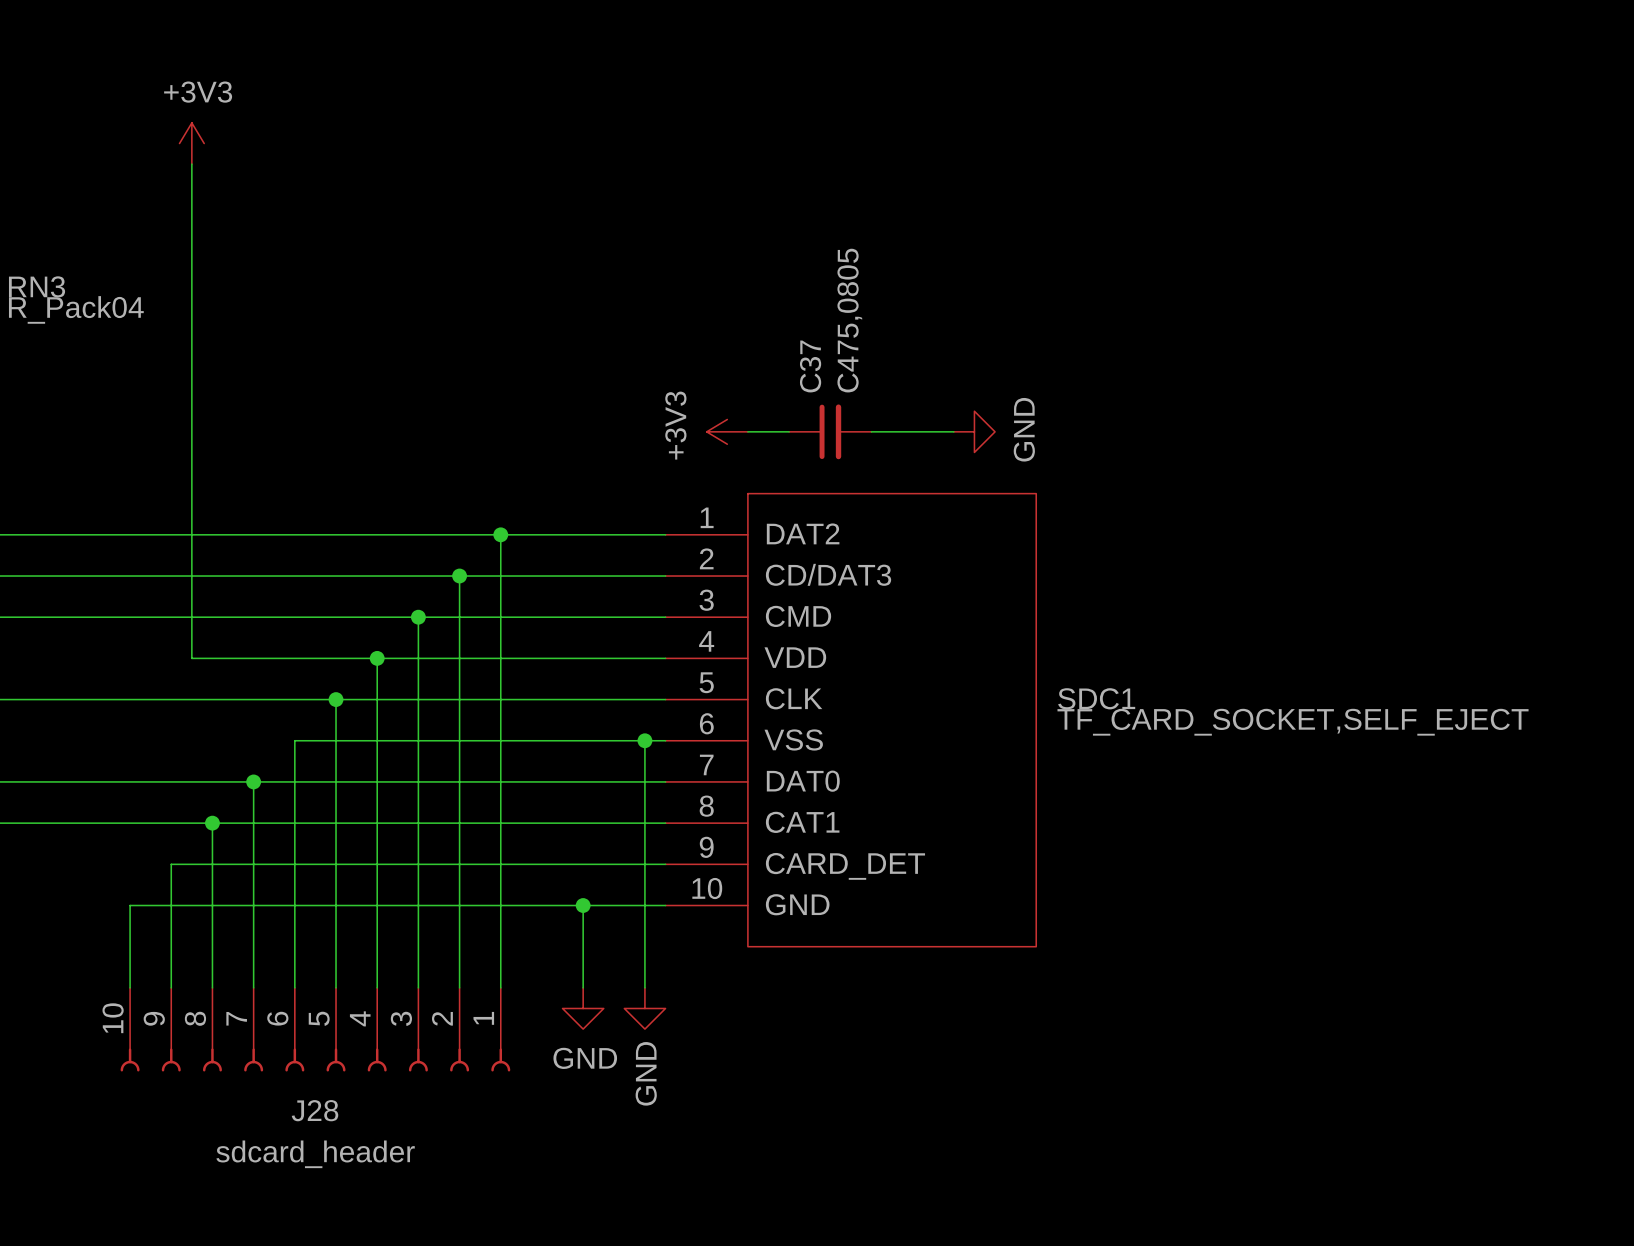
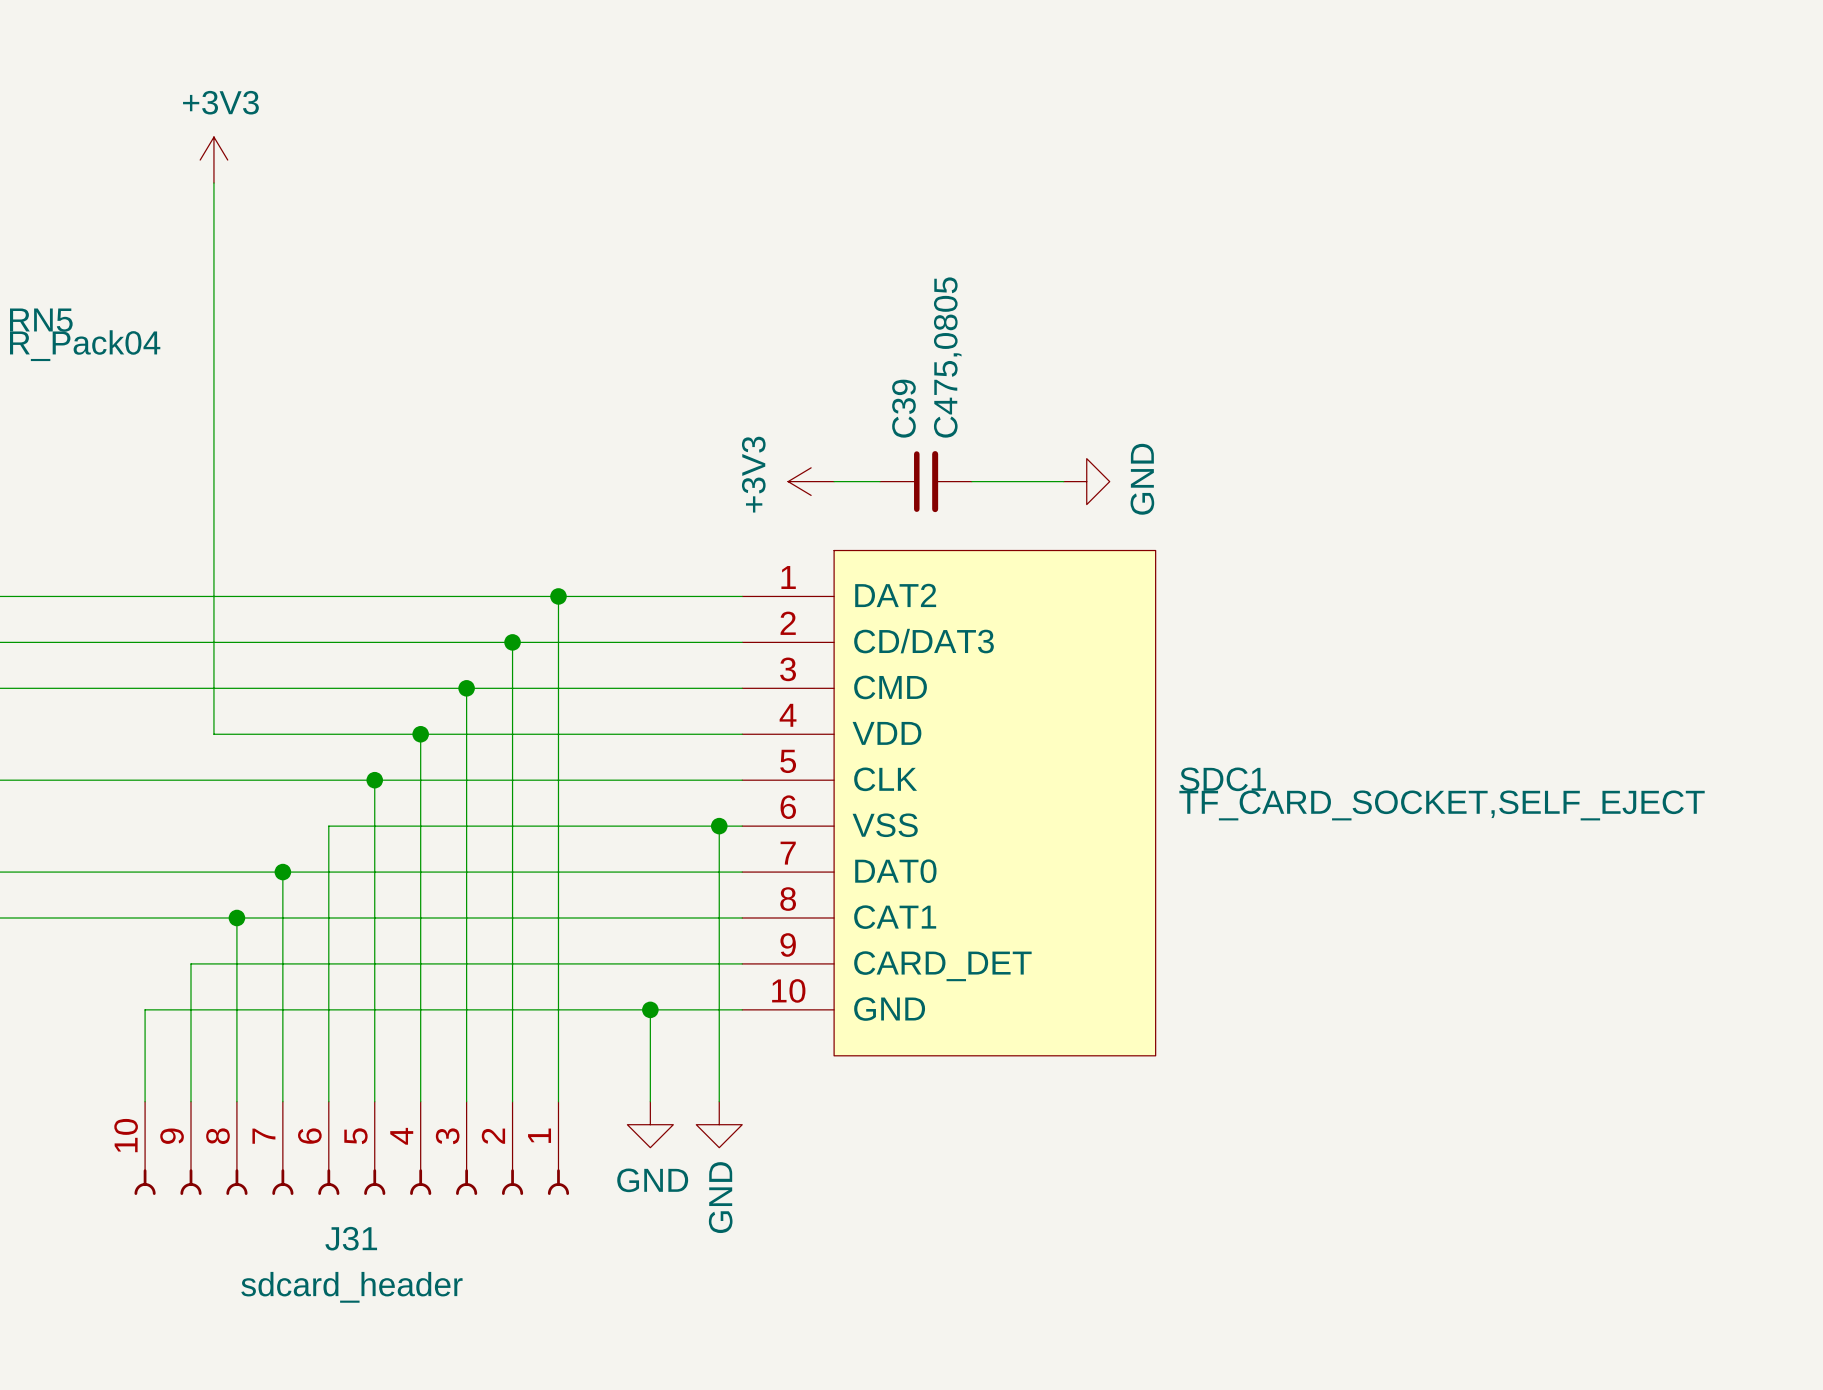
RN3 name: RN3 (37, 286) -> RN5 (41, 320)
C37 name: C37 (810, 366) -> C39 (903, 408)
J28 name: J28 (315, 1110) -> J31 (351, 1238)

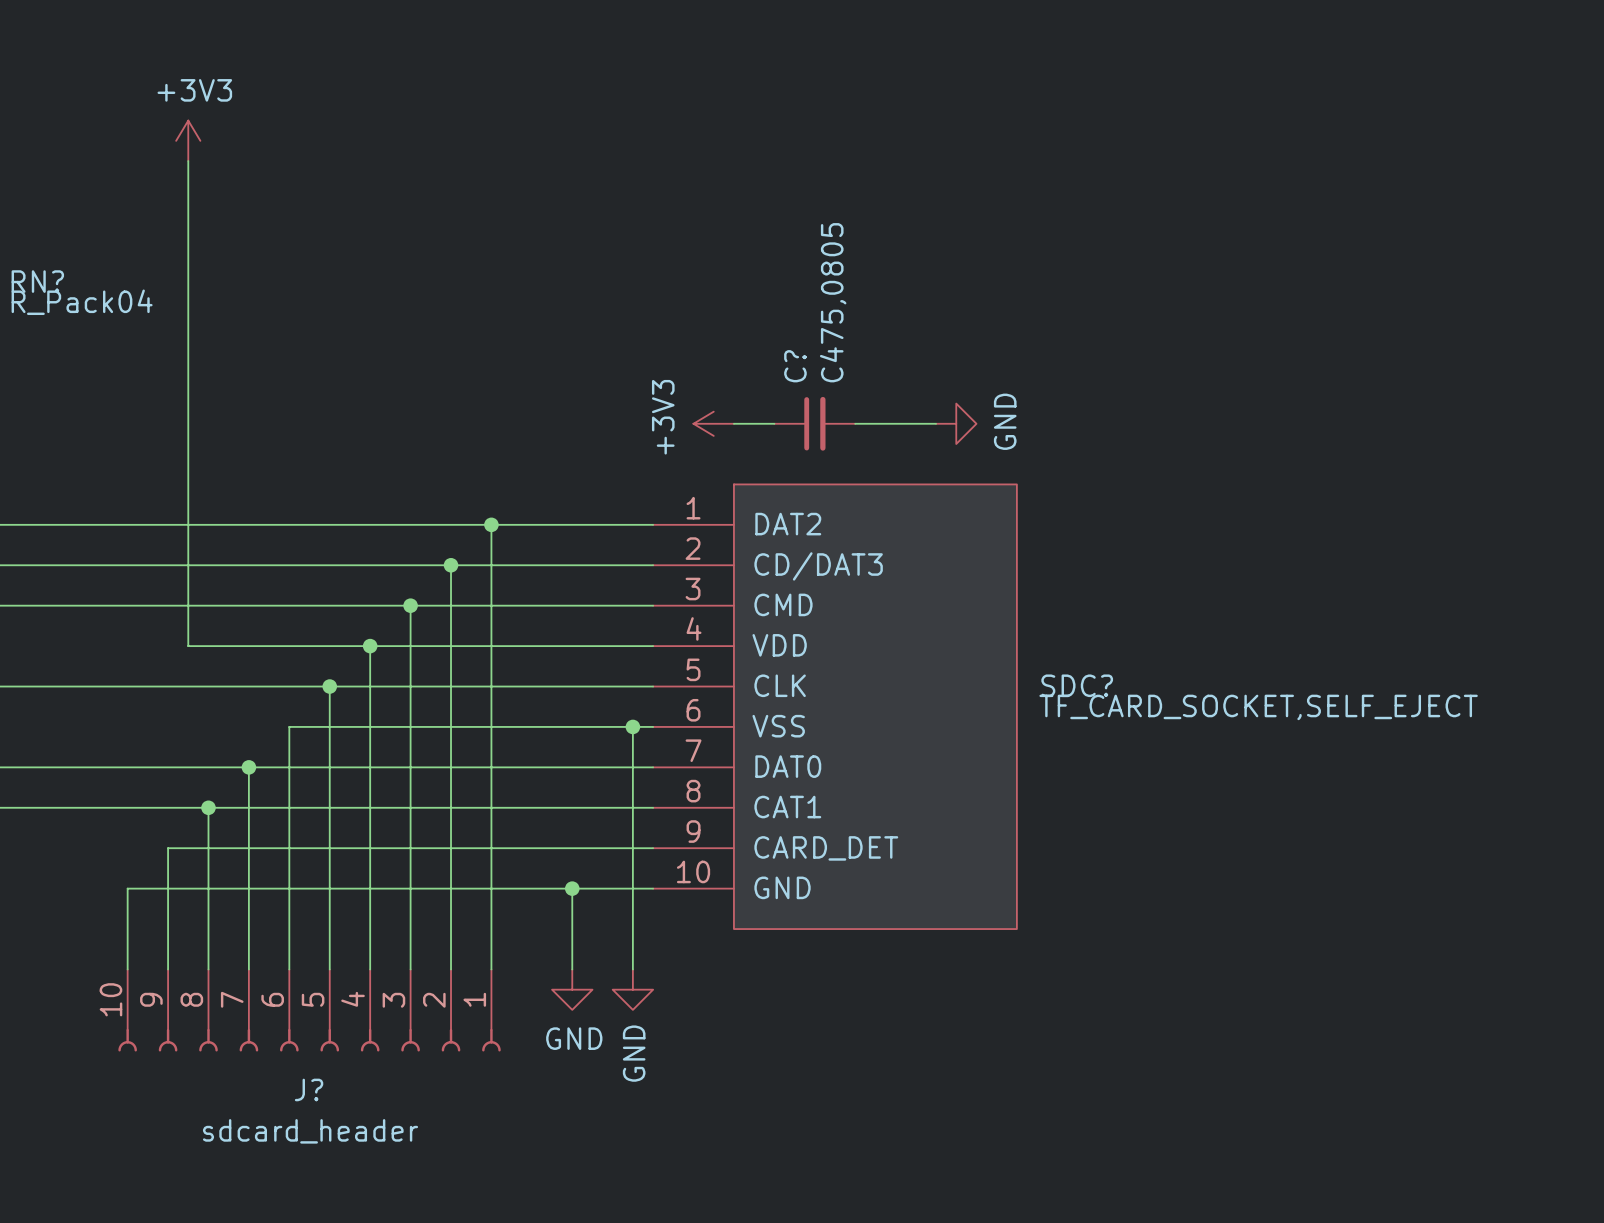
RN5 name: RN5 (41, 320) -> RN? (37, 281)
C39 name: C39 (903, 408) -> C? (795, 366)
SDC1 name: SDC1 (1223, 779) -> SDC? (1077, 685)
J31 name: J31 (351, 1238) -> J? (309, 1089)

